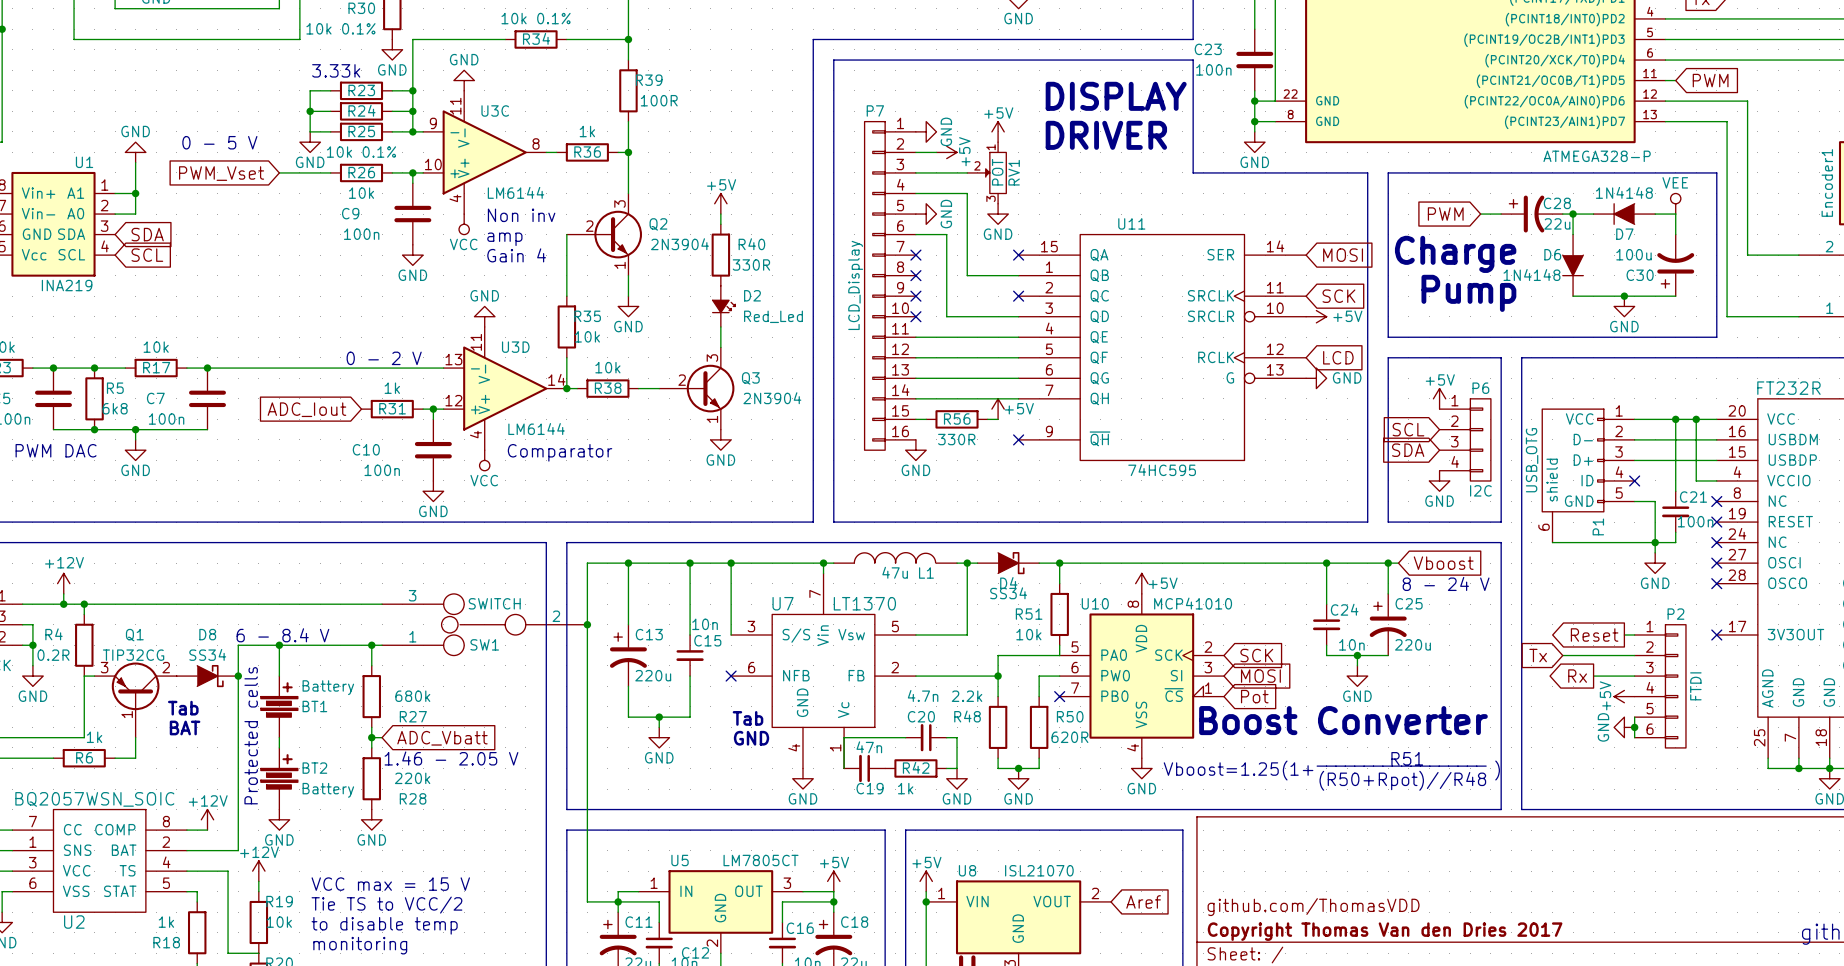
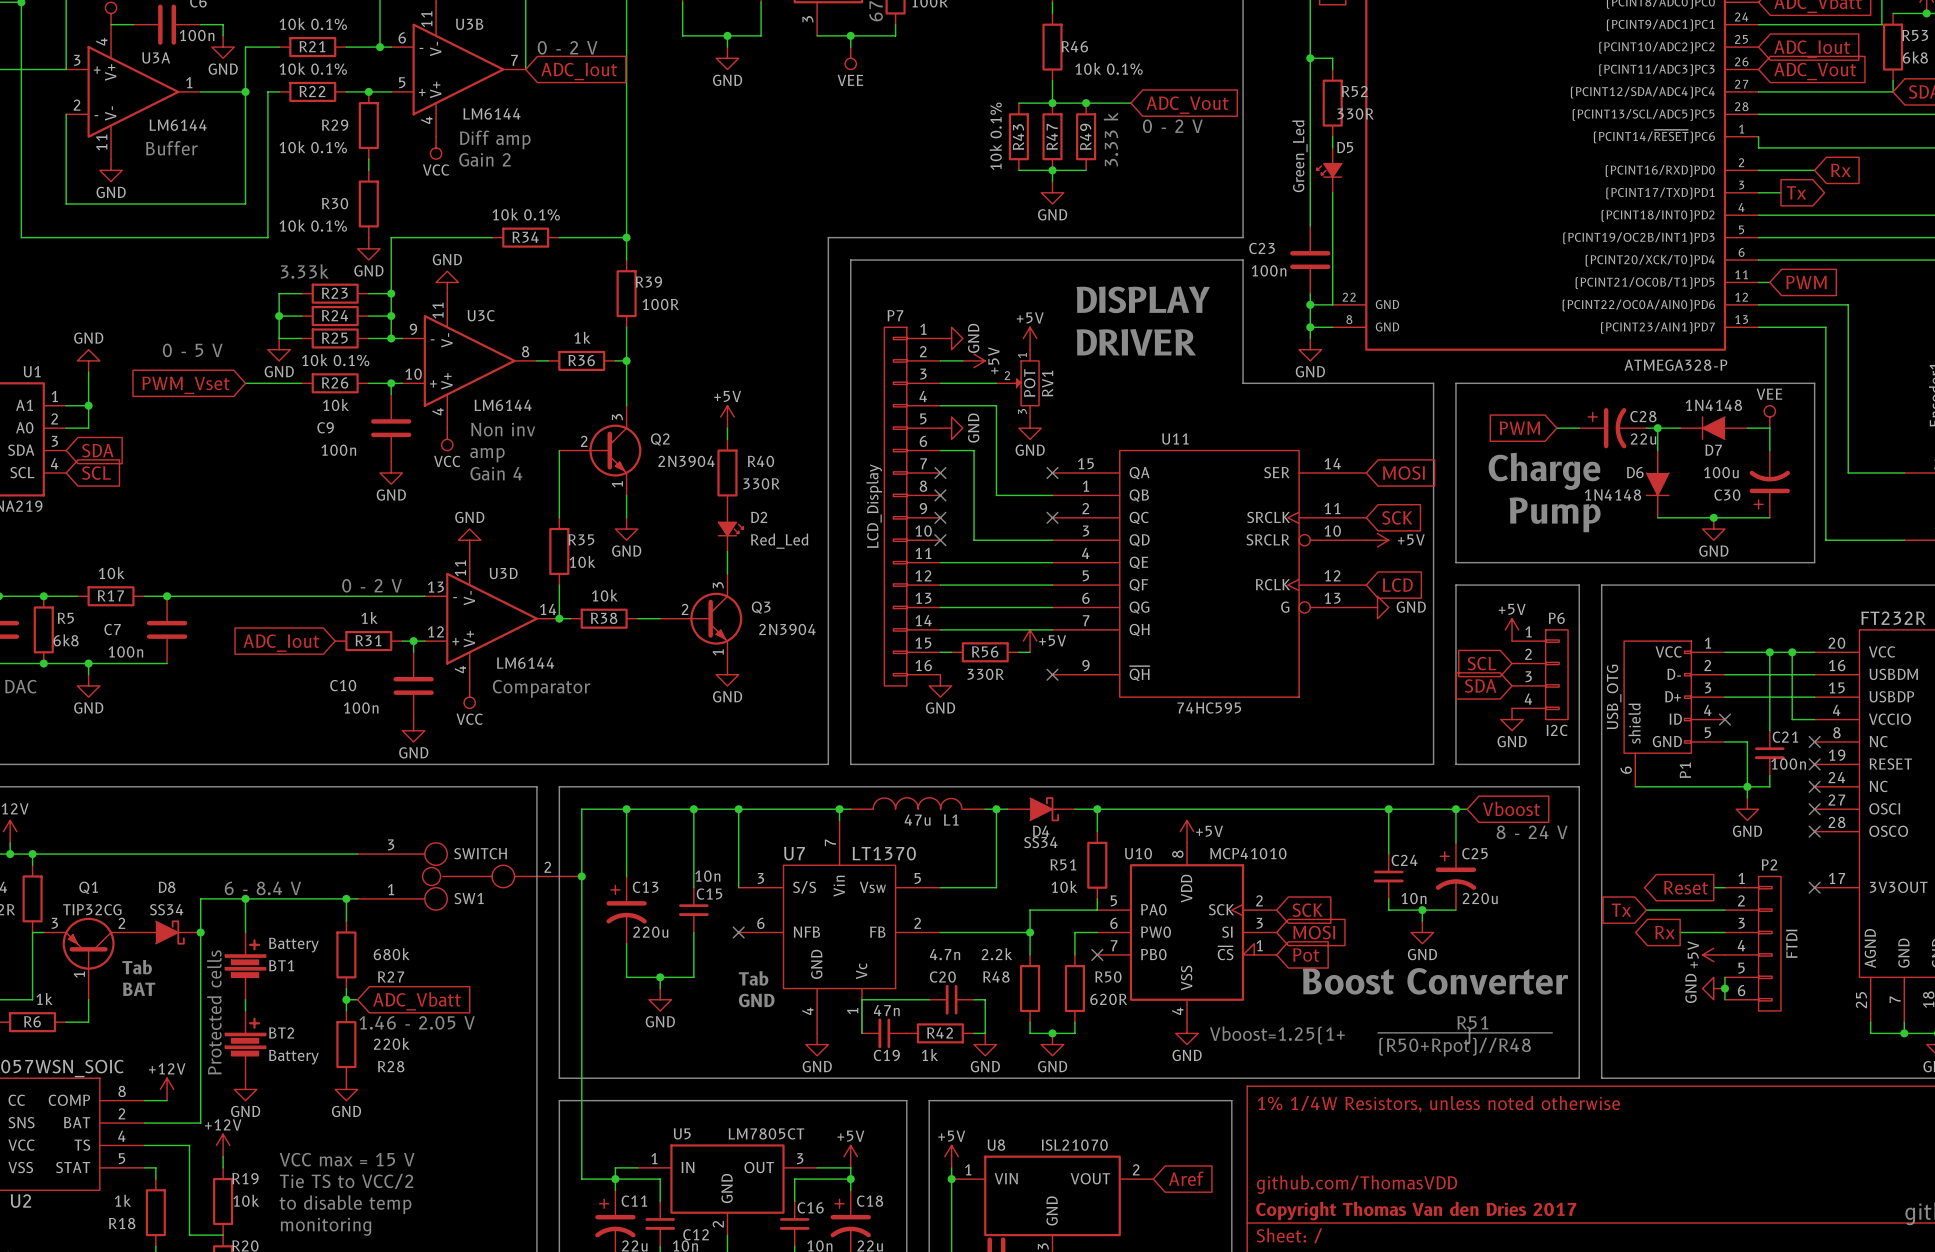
title block: none -> 1% 1/4W Resistors, unless noted otherwise (1438, 1104)

